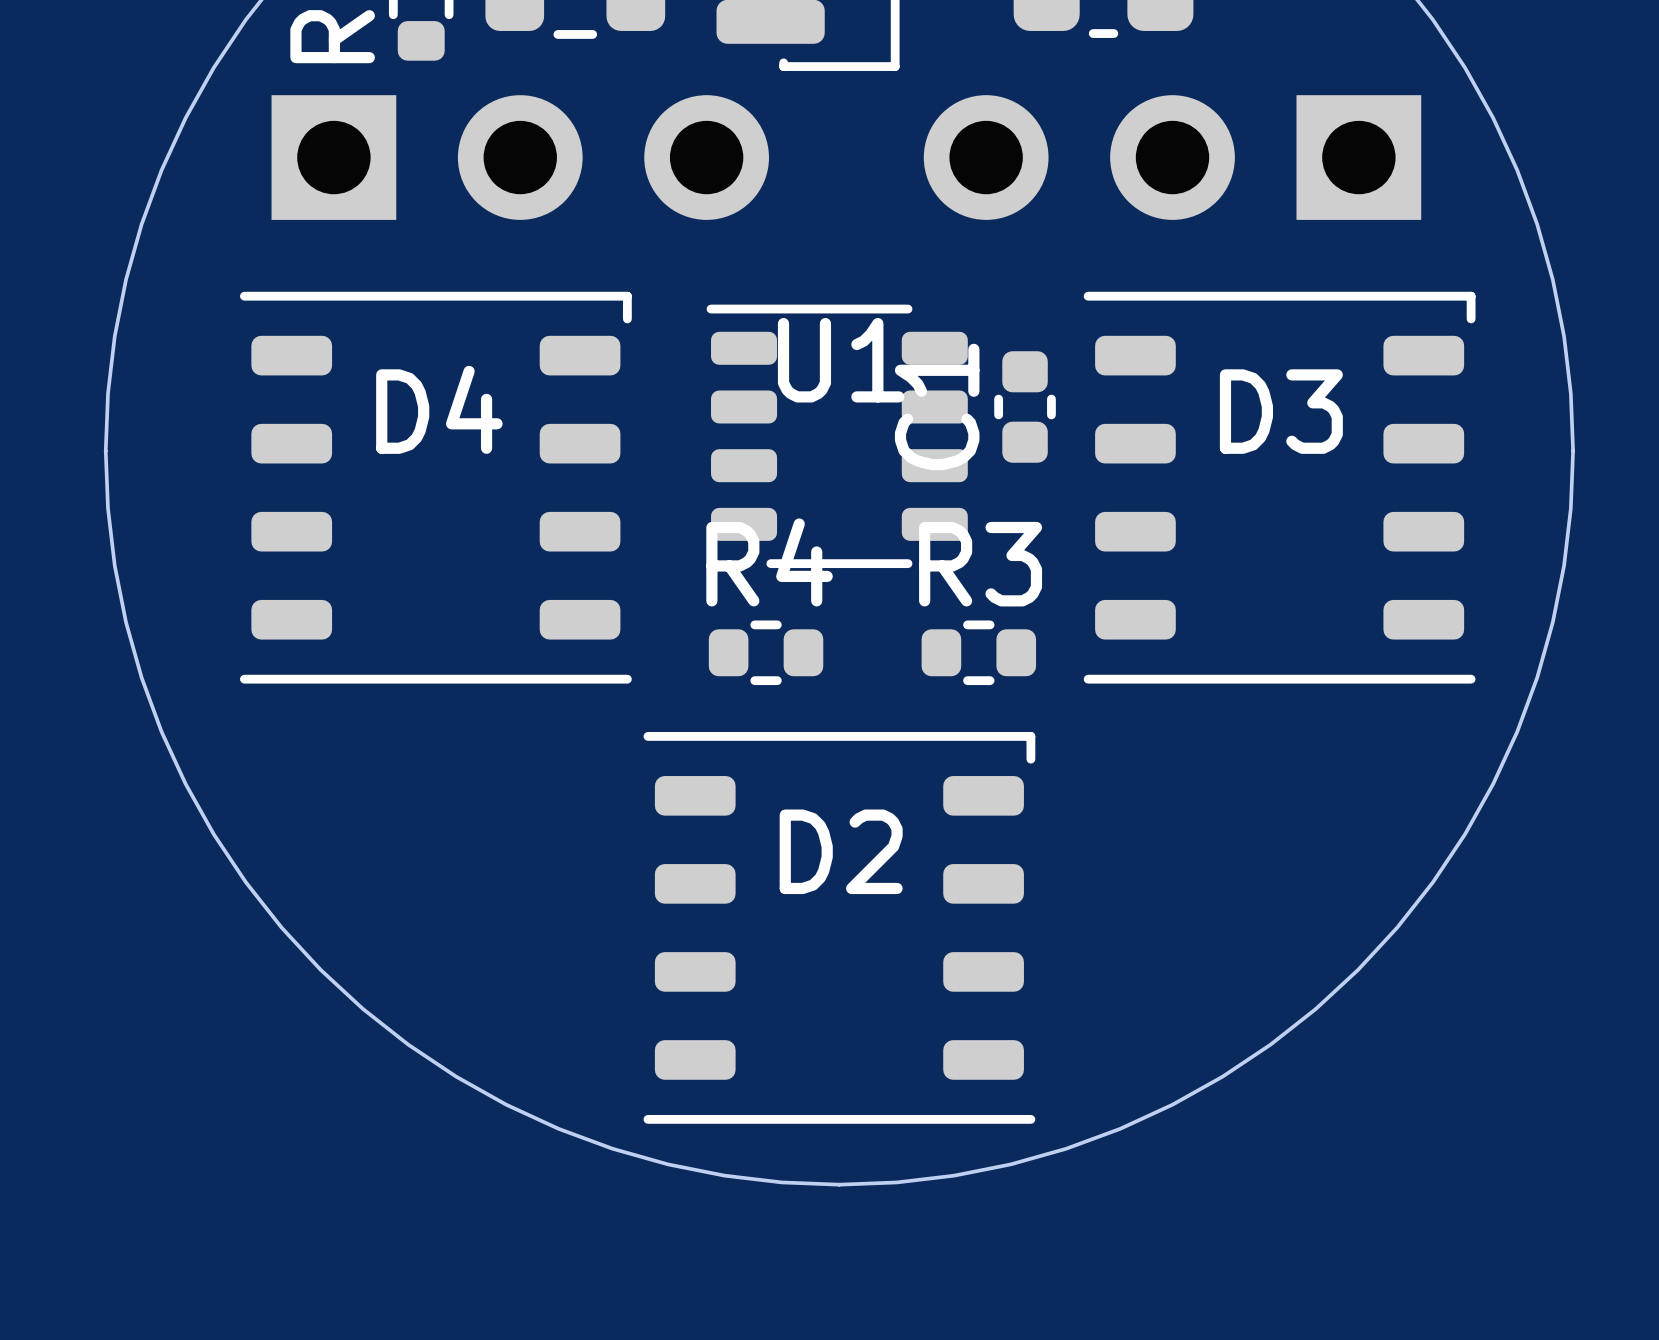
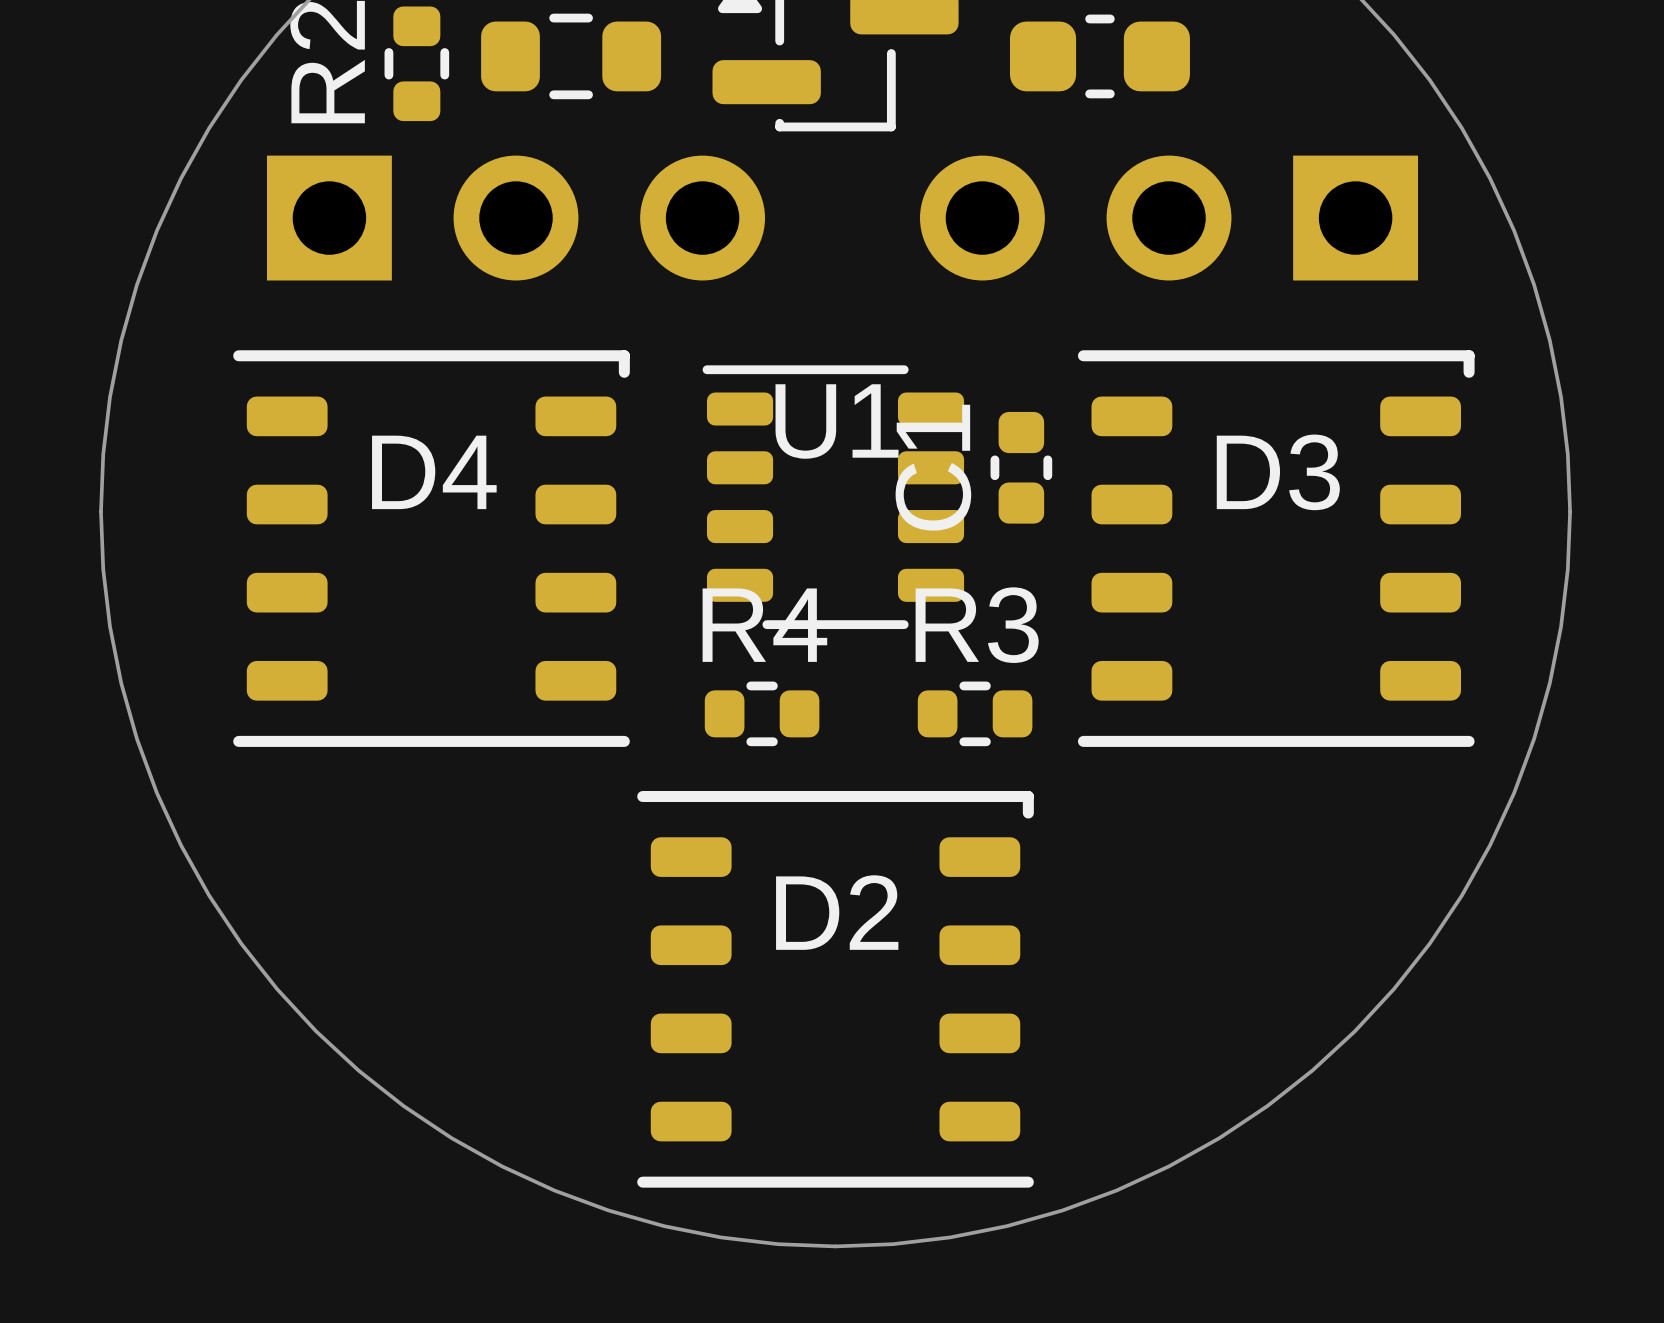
D4 footprint: [240, 291, 632, 684] -> [233, 350, 630, 747]
D3 footprint: [1083, 291, 1476, 684] -> [1077, 350, 1475, 747]
D2 footprint: [643, 732, 1036, 1124] -> [637, 790, 1034, 1188]

